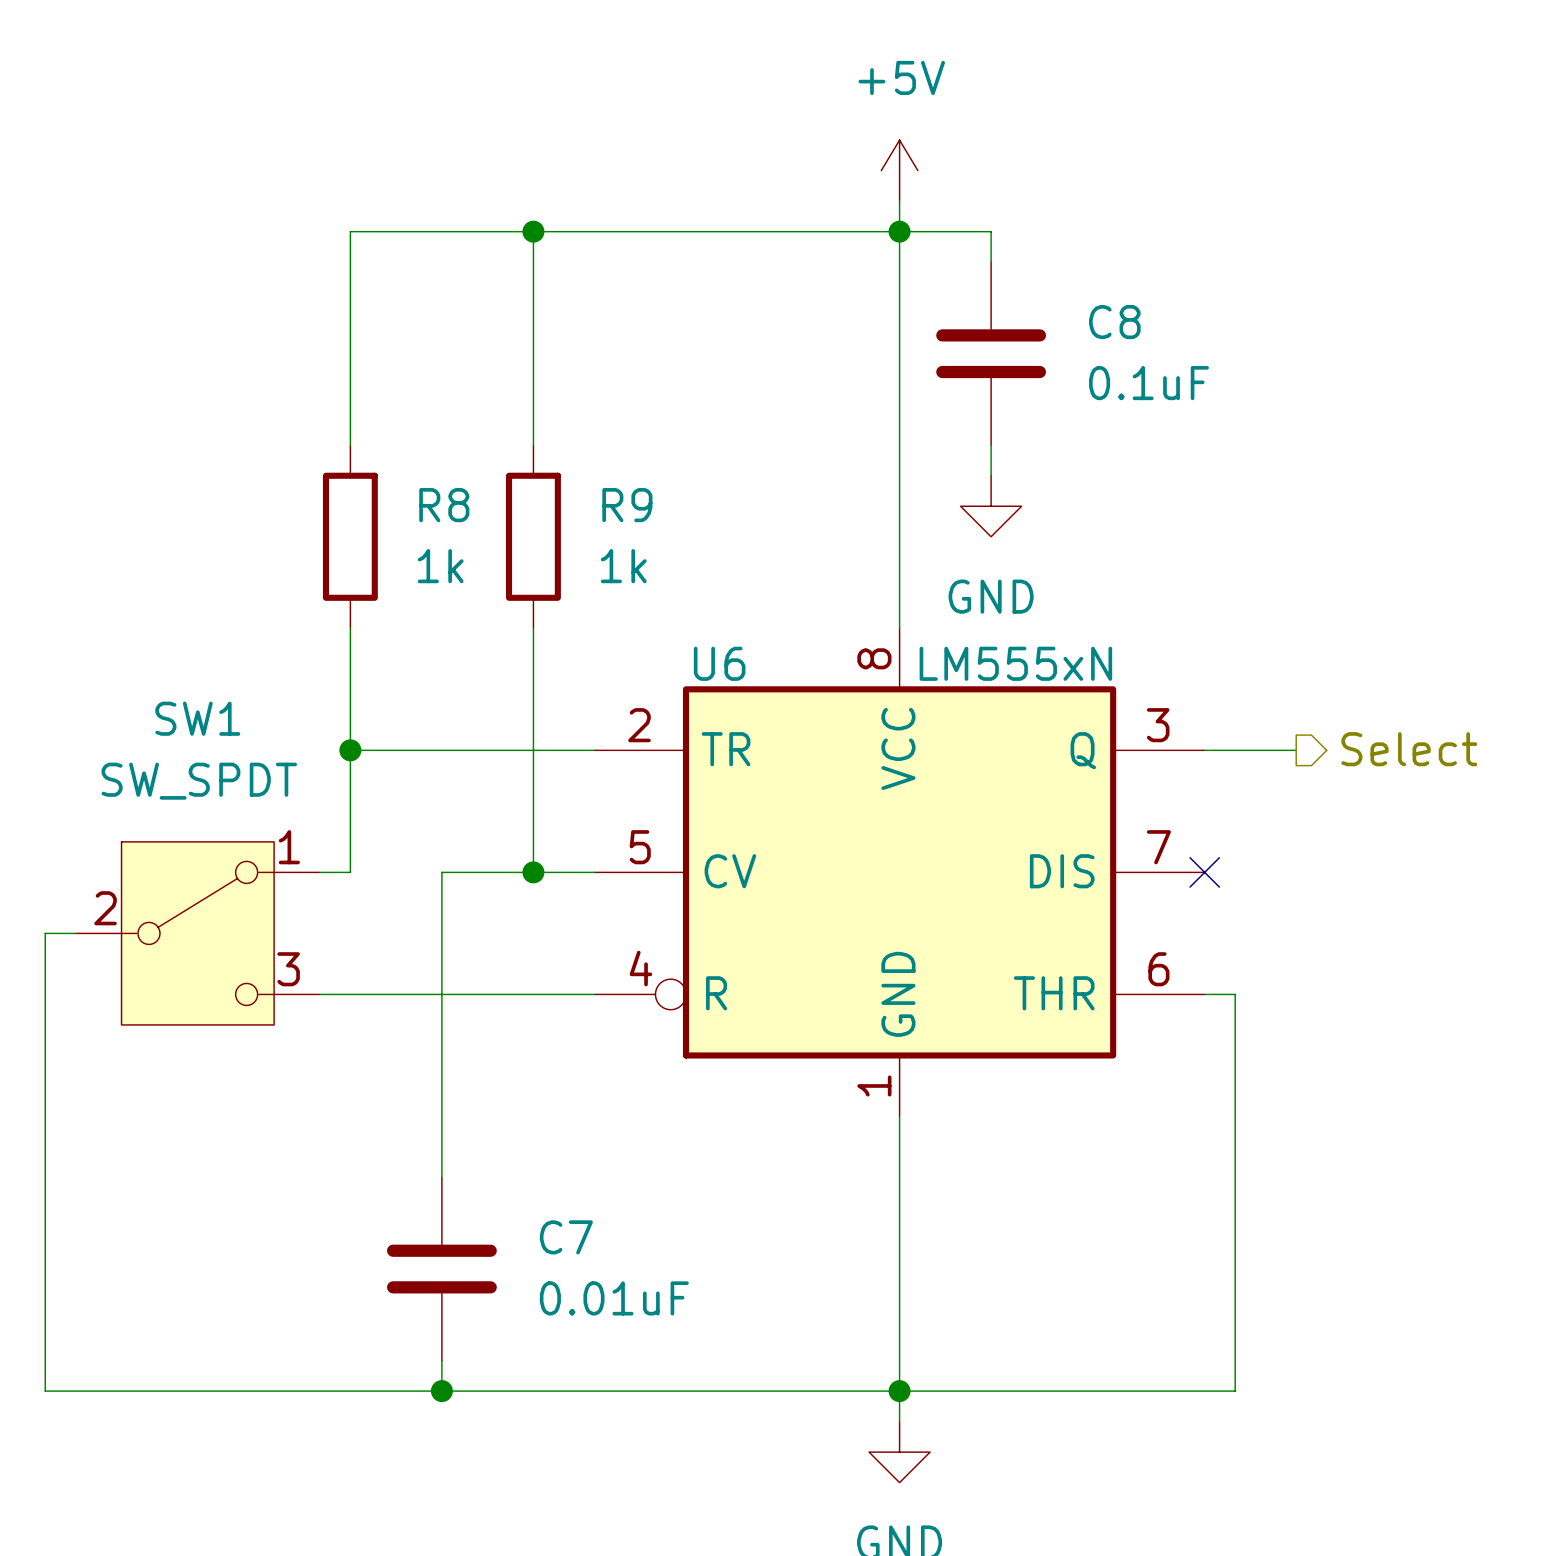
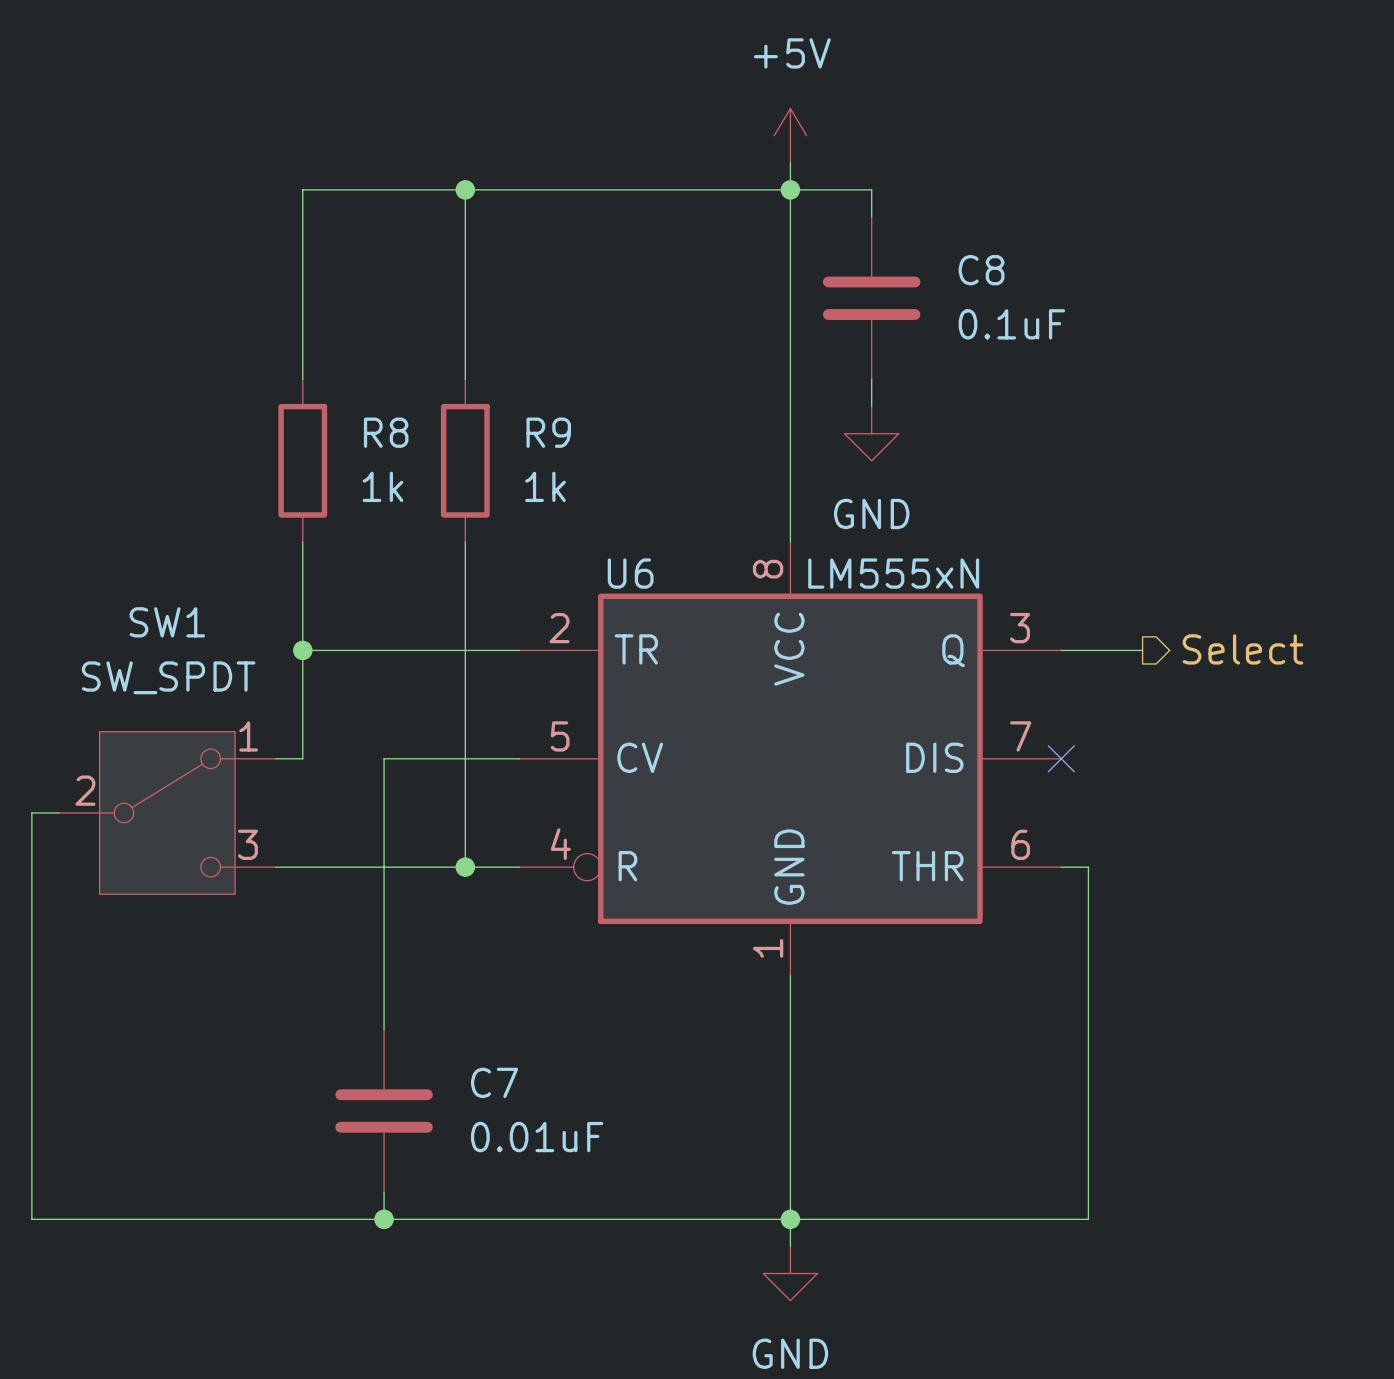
wire: none -> (465, 758) (465, 867)
junction position: (533, 872) -> (465, 867)

